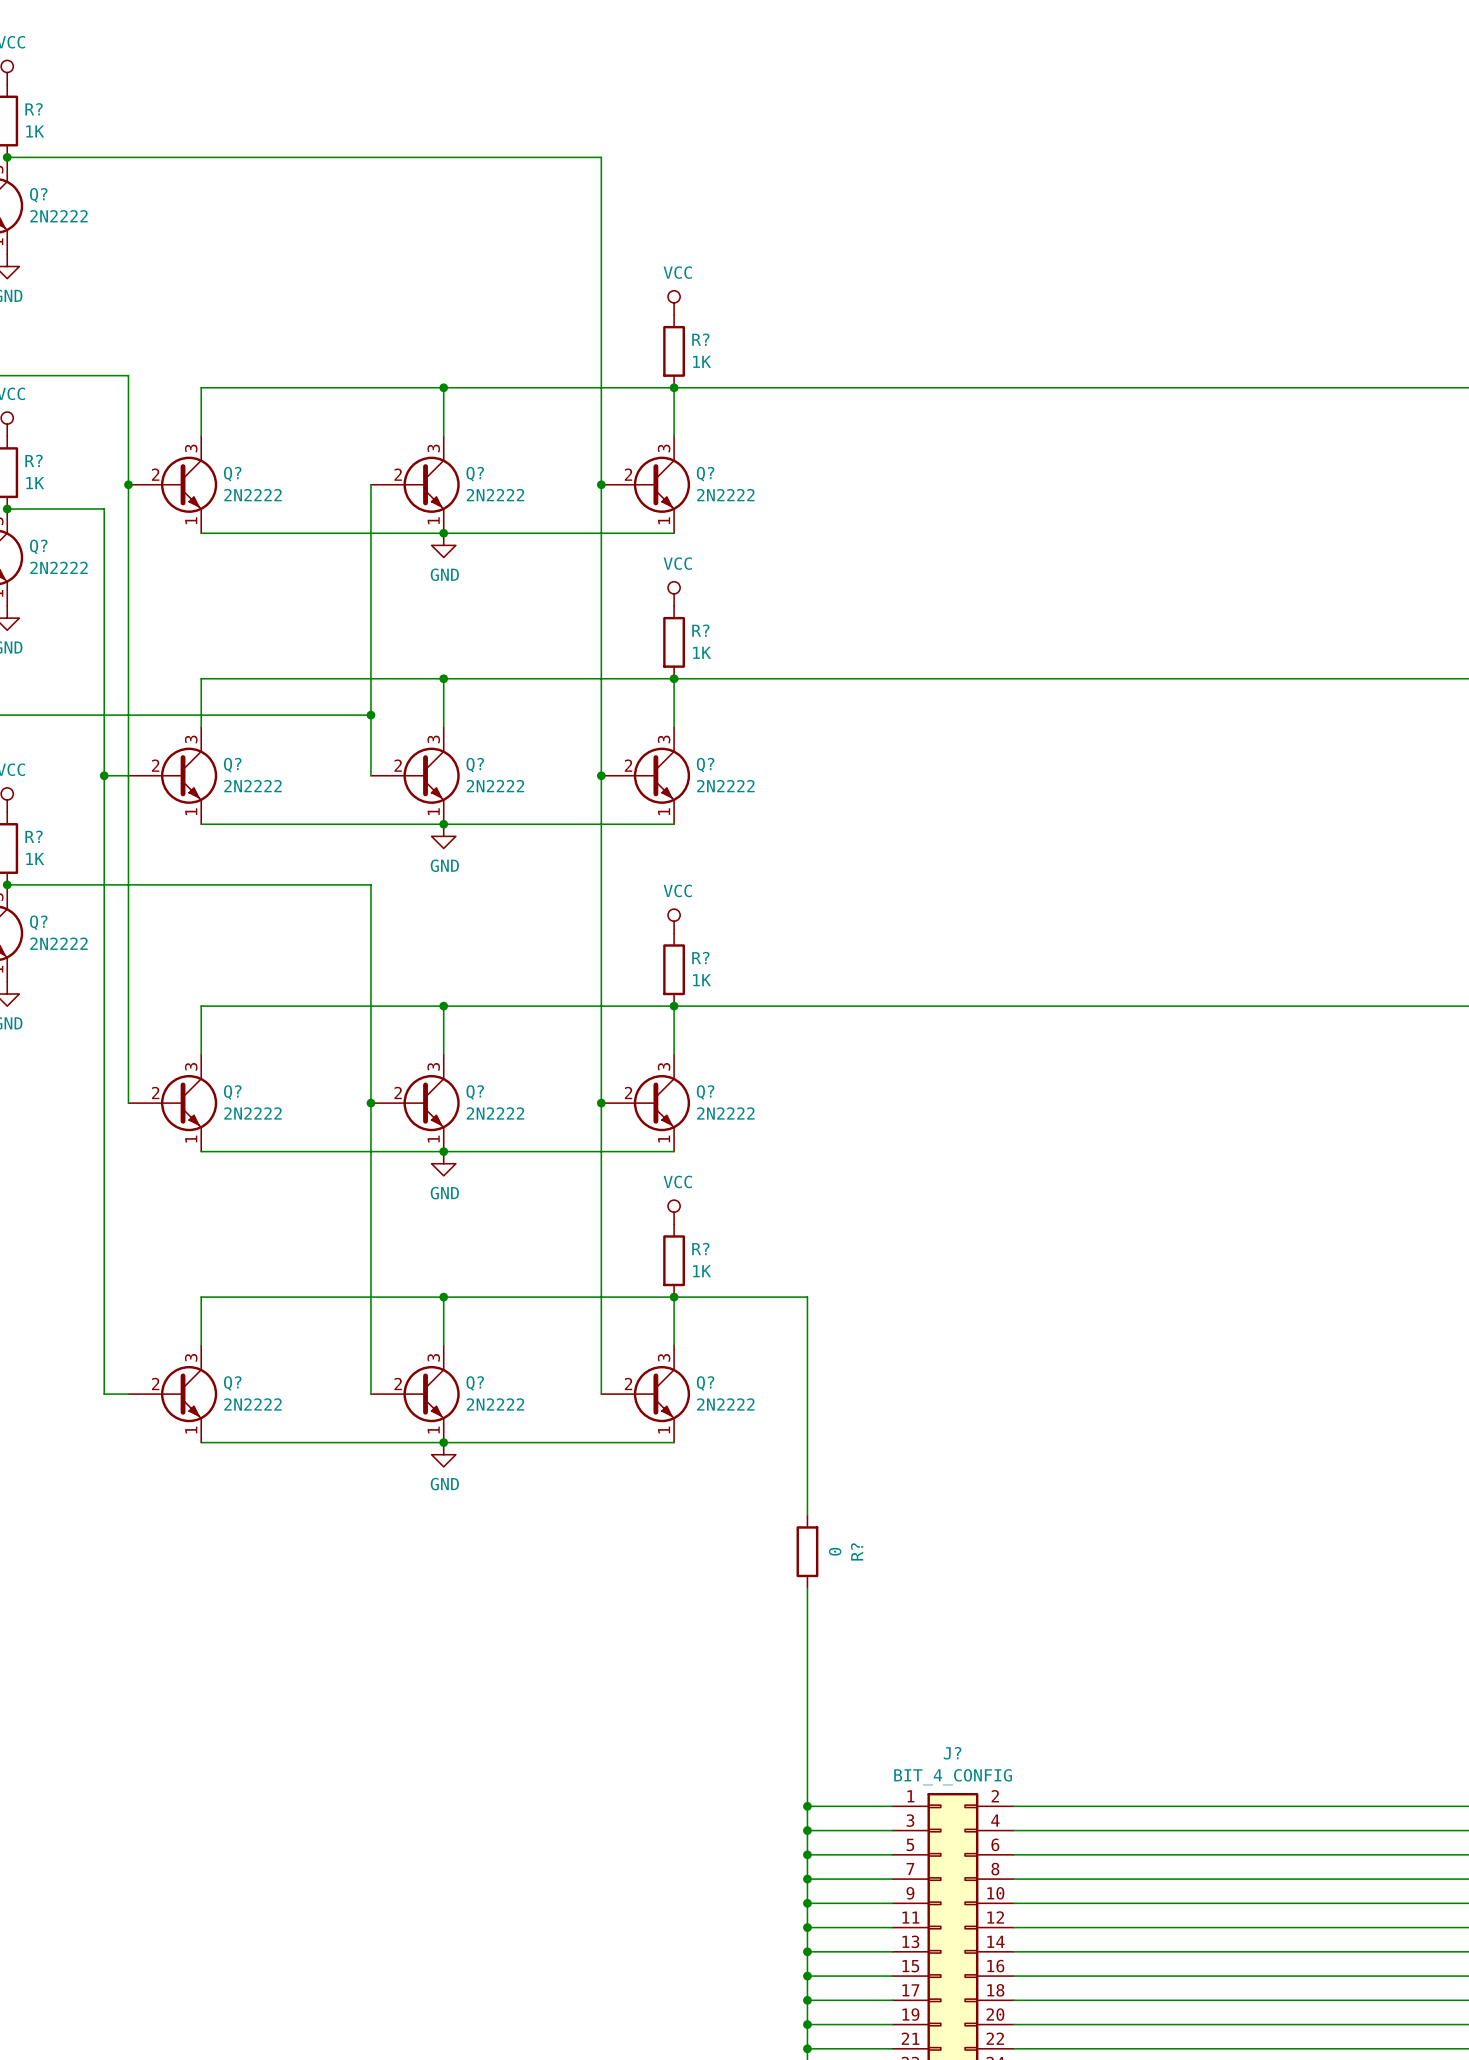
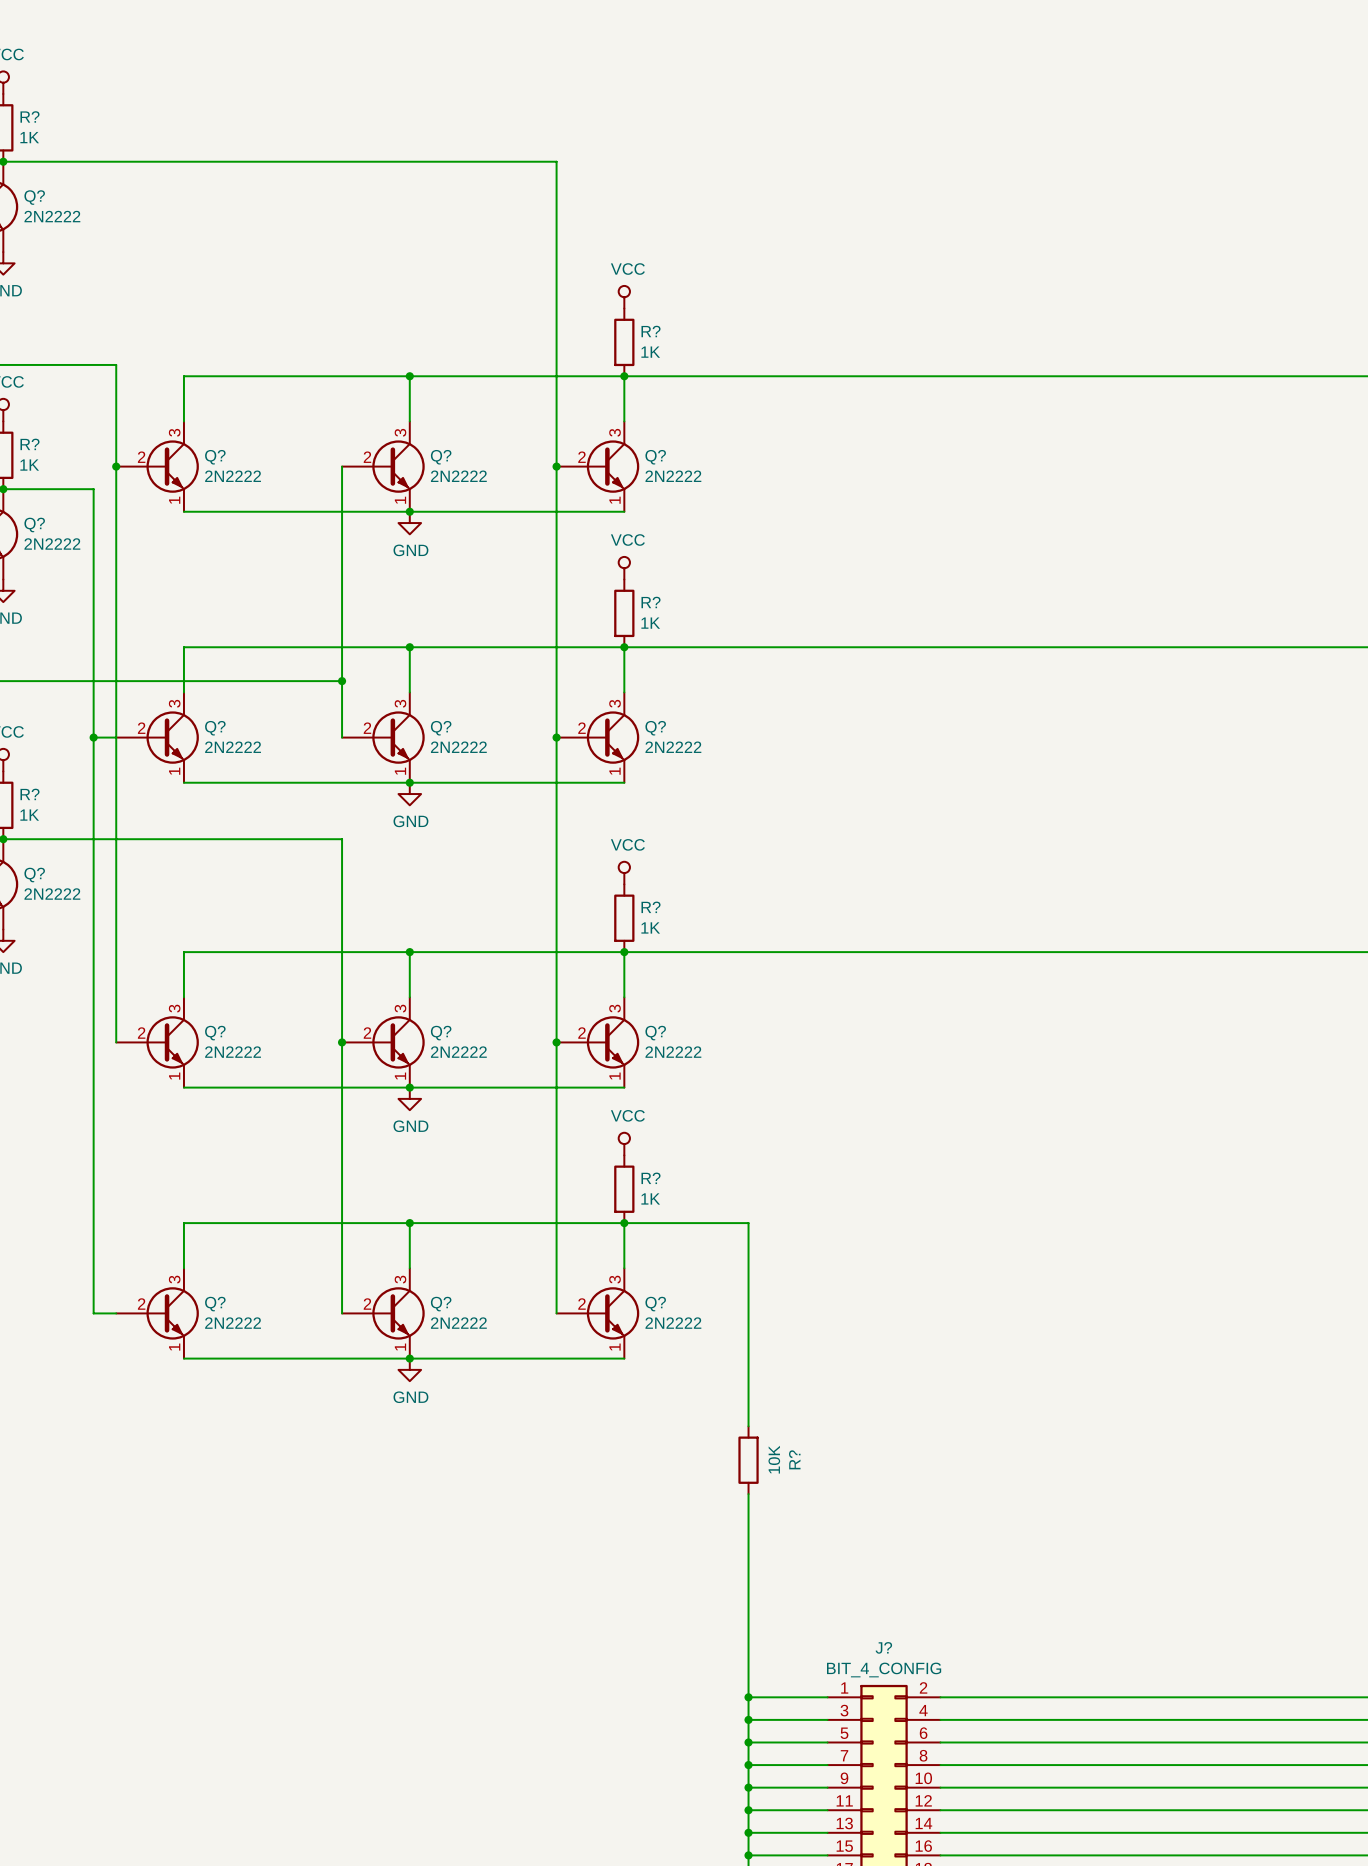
R? value: 0 (835, 1551) -> 10K (774, 1459)

